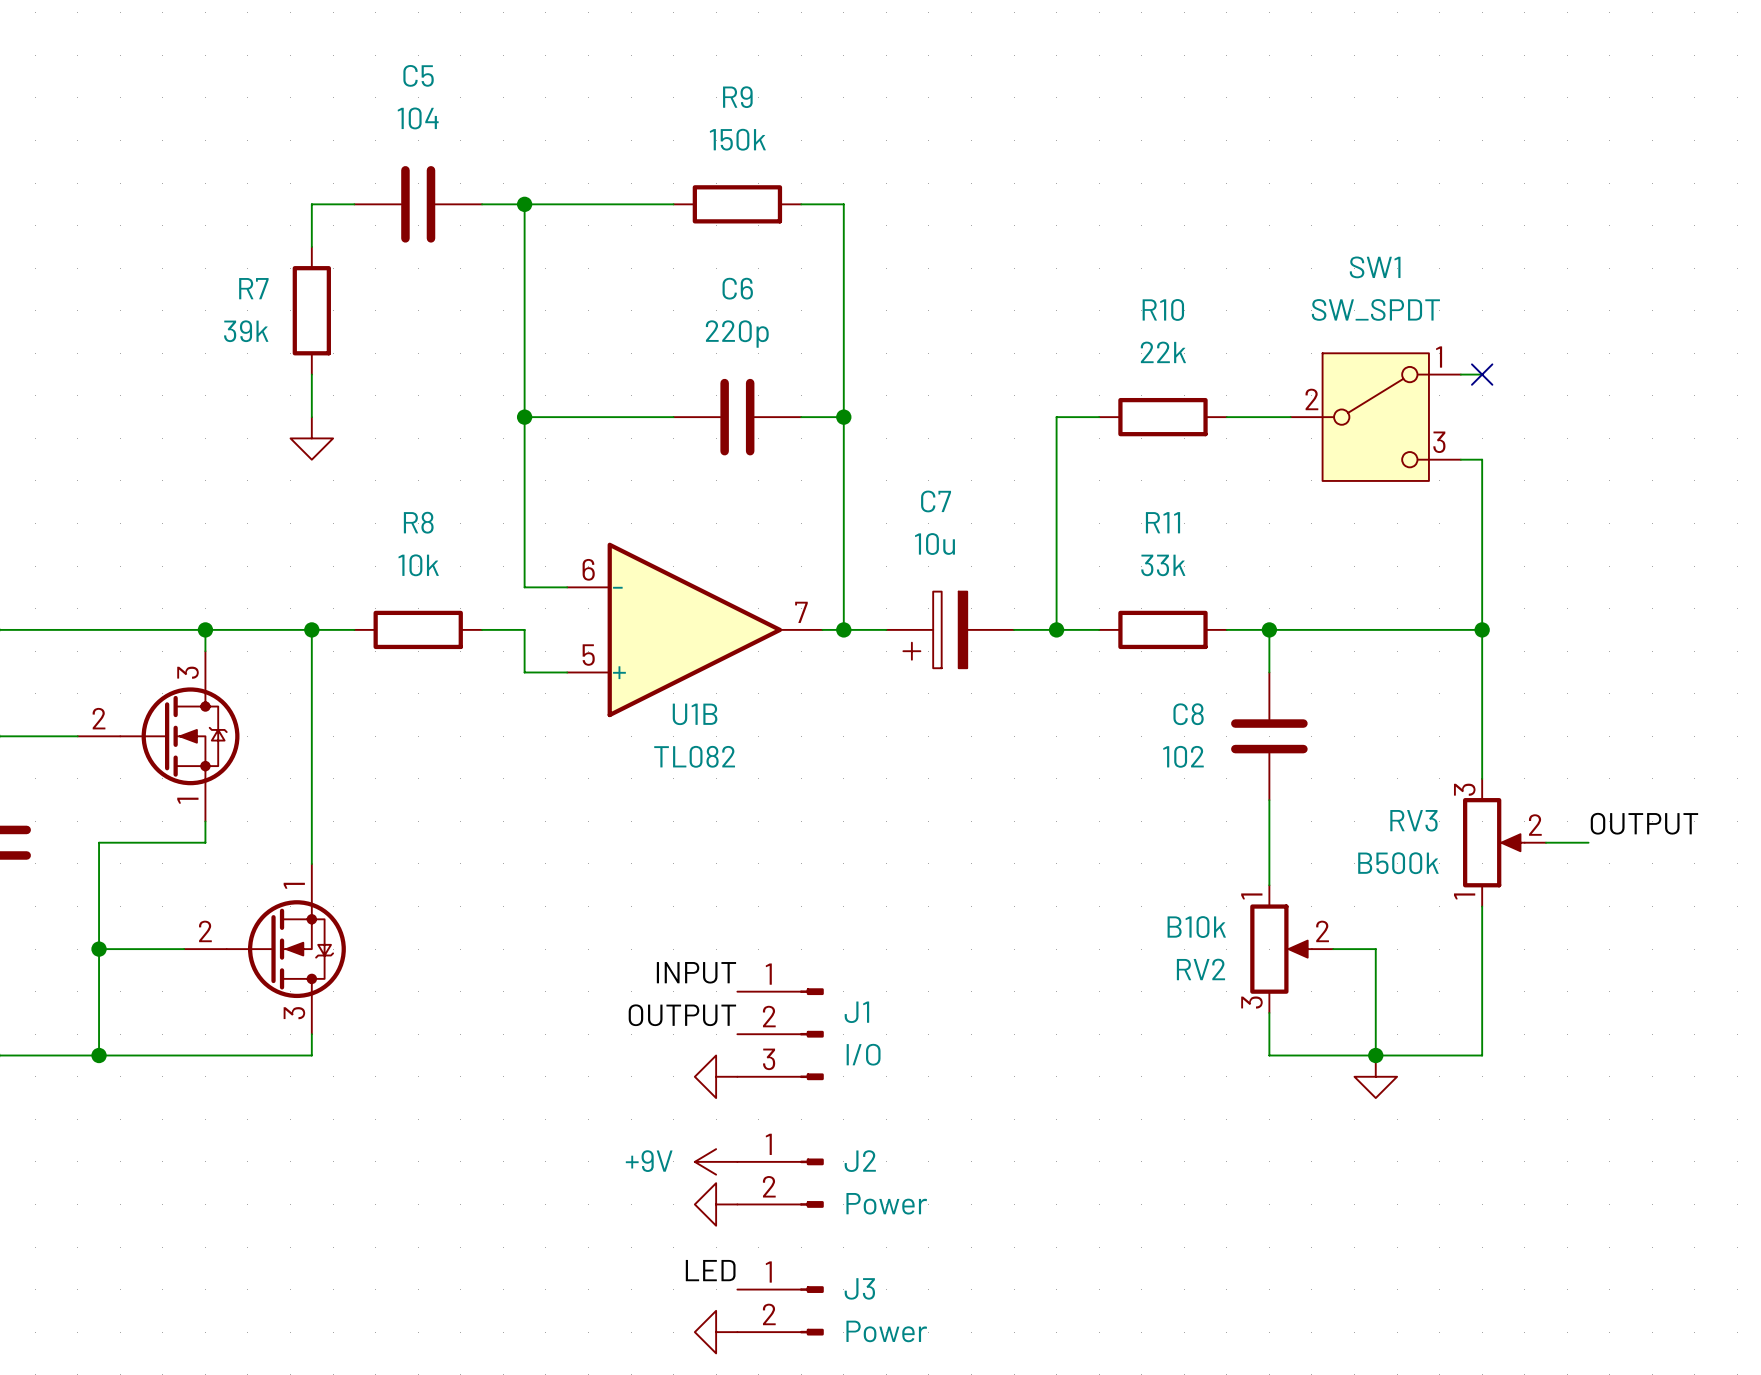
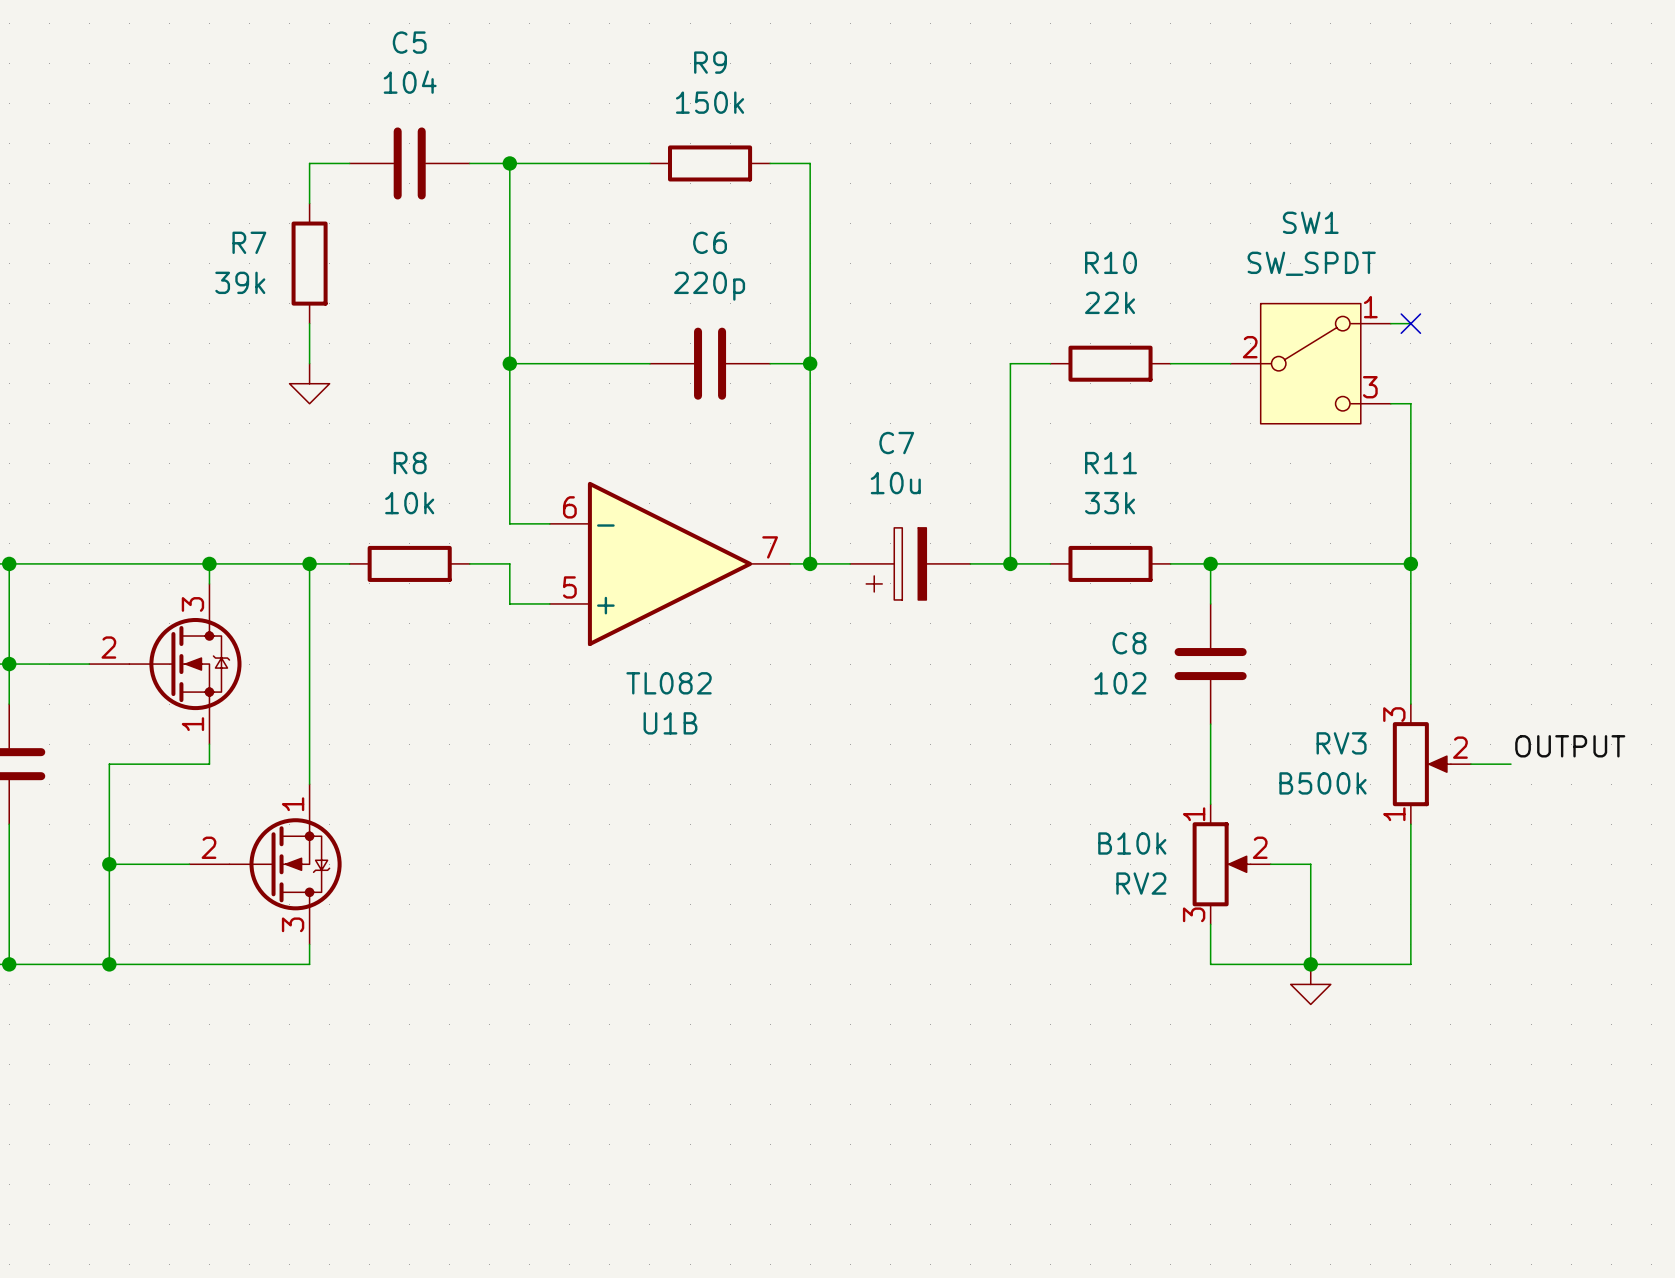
U1B name position: U1B (695, 714) -> U1B (670, 723)
label: INPUT (696, 972) -> none
label: OUTPUT (682, 1015) -> none
J1: I/O (780, 1034) -> none
power symbol: (716, 1076) -> none
power symbol: +9V (716, 1161) -> none
J2: Power (780, 1183) -> none
power symbol: (716, 1204) -> none
label: LED (710, 1270) -> none
J3: Power (780, 1310) -> none
power symbol: (716, 1332) -> none

